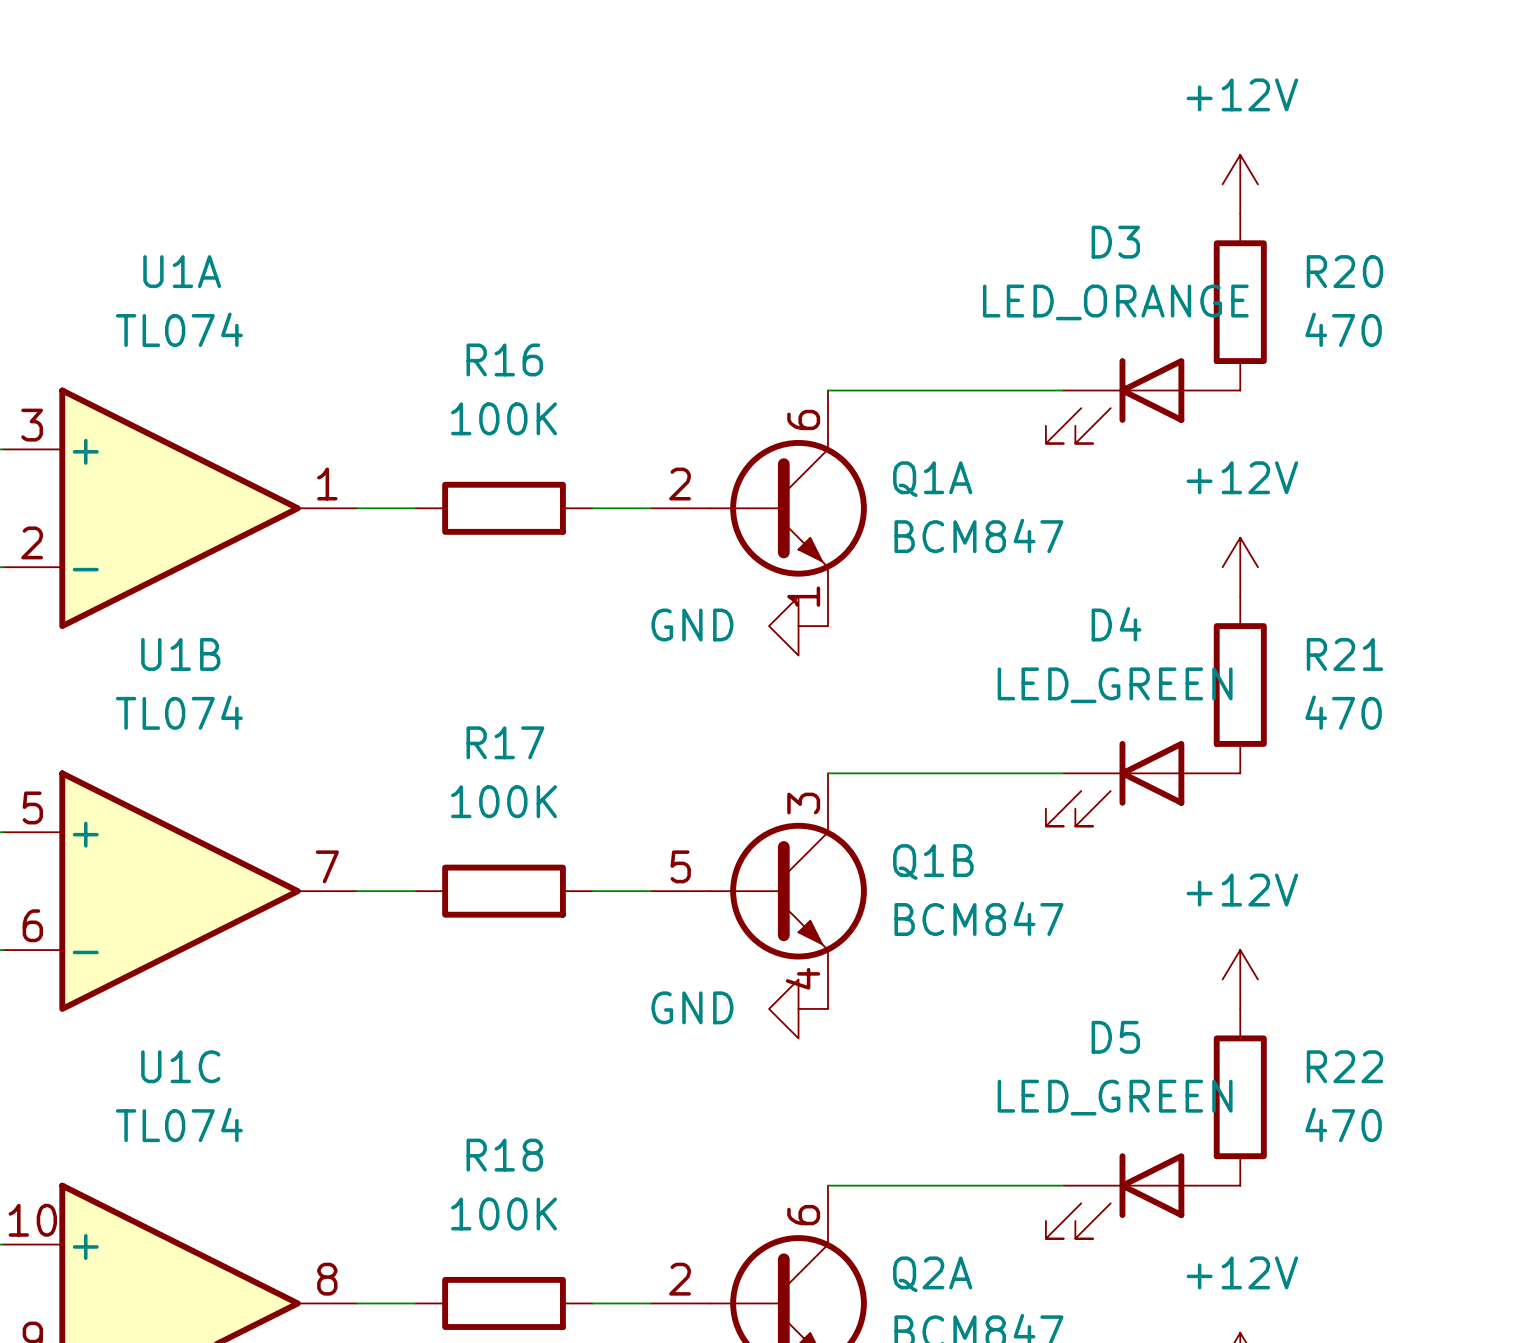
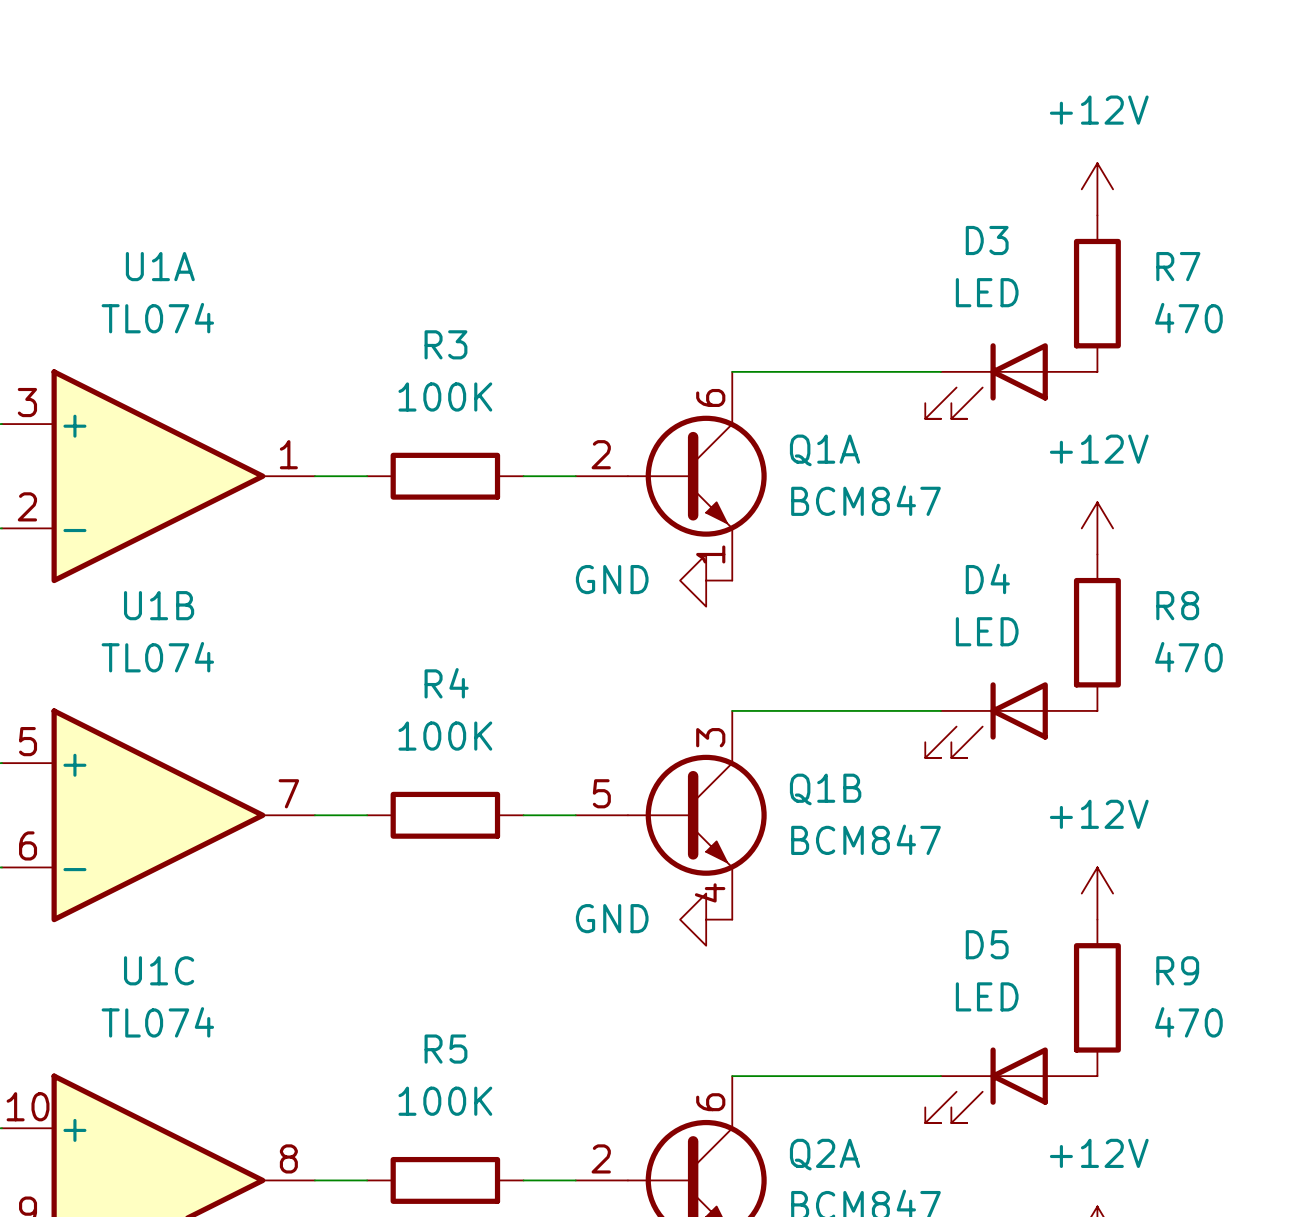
R20 name: R20 (1344, 271) -> R7 (1178, 266)
D3 value: LED_ORANGE (1115, 302) -> LED (987, 292)
R16 name: R16 (504, 359) -> R3 (445, 344)
R21 name: R21 (1344, 654) -> R8 (1177, 605)
D4 value: LED_GREEN (1115, 685) -> LED (987, 631)
R17 name: R17 (505, 742) -> R4 (446, 683)
R22 name: R22 (1344, 1066) -> R9 (1177, 970)
D5 value: LED_GREEN (1115, 1097) -> LED (987, 996)
R18 name: R18 (504, 1155) -> R5 (445, 1049)

